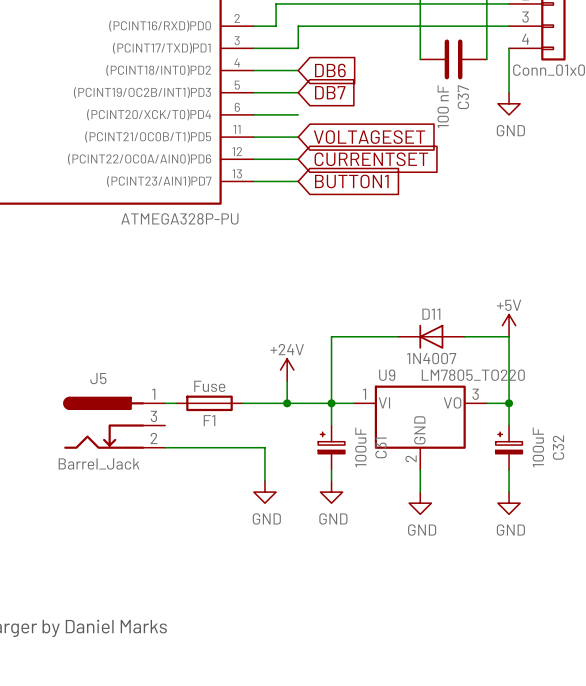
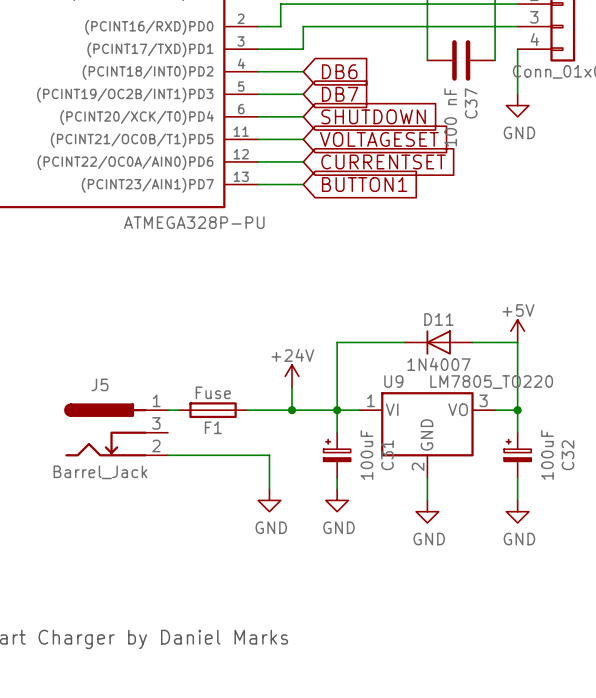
global label: none -> SHUTDOWN (373, 116)

